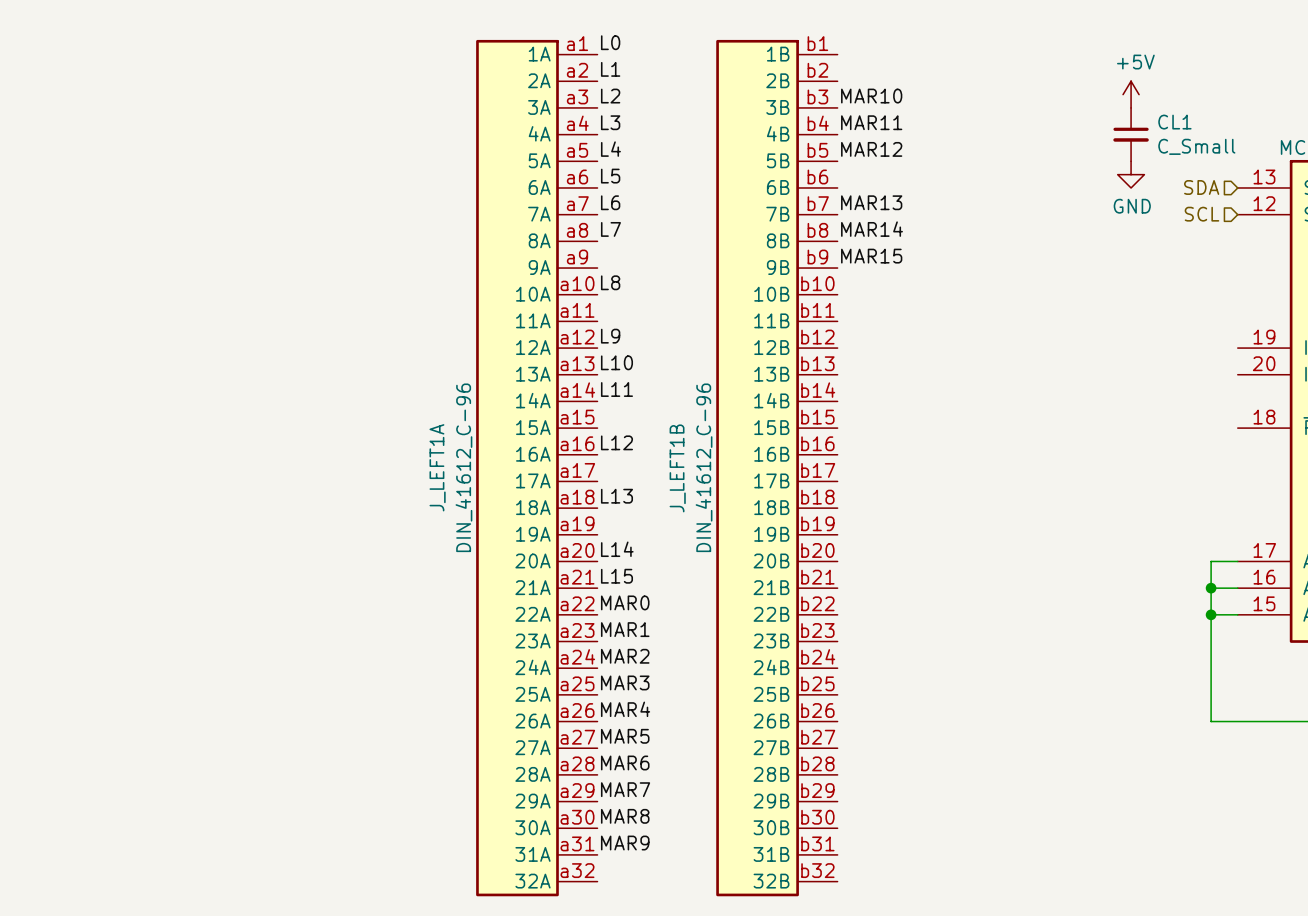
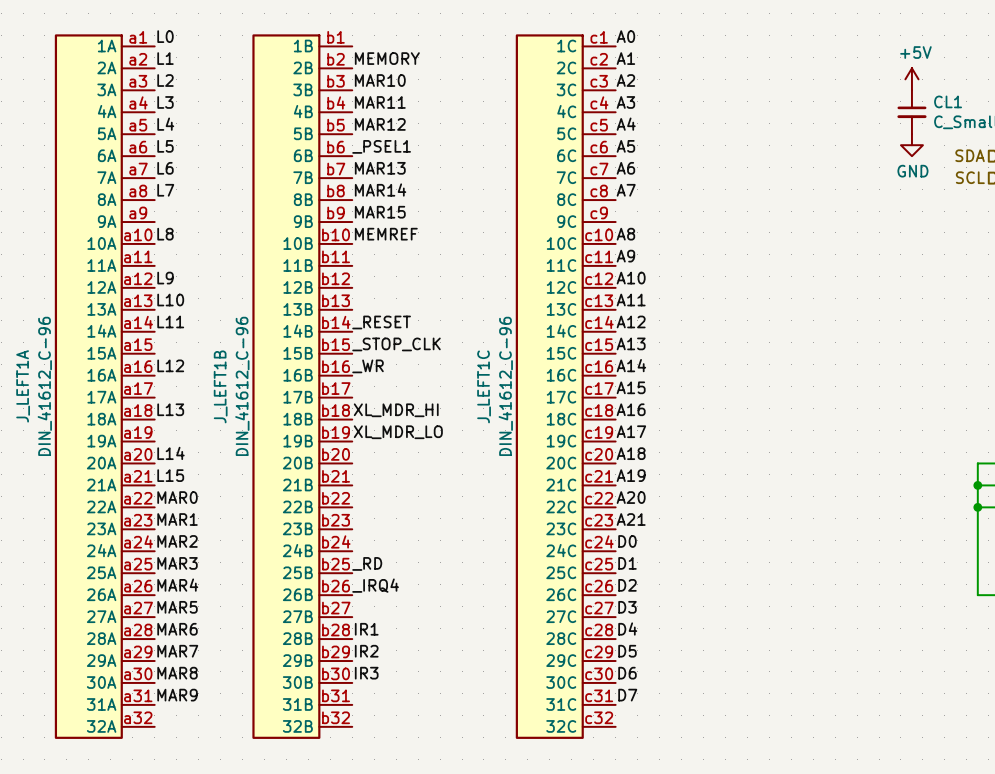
label: none -> L0 (165, 36)
label: L0 (610, 42) -> none
label: none -> A0 (625, 36)
label: none -> L1 (165, 58)
label: none -> MEMORY (387, 58)
label: L1 (610, 69) -> none
label: none -> A1 (625, 58)
label: none -> L2 (165, 80)
label: none -> MAR10 (380, 80)
label: L2 (610, 96) -> none
label: none -> A2 (625, 80)
label: MAR10 (871, 96) -> none
label: none -> L3 (165, 102)
label: none -> MAR11 (380, 102)
label: L3 (610, 122) -> none
label: none -> A3 (625, 102)
label: MAR11 (871, 122) -> none
label: none -> L4 (165, 124)
label: none -> MAR12 (380, 124)
label: L4 (610, 149) -> none
label: none -> A4 (626, 124)
label: MAR12 (871, 149) -> none
label: none -> L5 (165, 146)
label: none -> _PSEL1 (381, 146)
label: L5 (610, 176) -> none
label: none -> A5 (625, 146)
label: none -> L6 (165, 168)
label: none -> MAR13 (380, 168)
label: L6 (610, 202) -> none
label: none -> A6 (625, 168)
label: MAR13 (871, 202) -> none
label: none -> L7 (165, 190)
label: none -> MAR14 (380, 190)
label: L7 (610, 229) -> none
label: none -> A7 (626, 190)
label: MAR14 (872, 229) -> none
label: none -> MAR15 (380, 212)
label: MAR15 (871, 256) -> none
label: none -> L8 (165, 234)
label: none -> MEMREF (386, 234)
label: L8 (610, 282) -> none
label: none -> A8 (625, 234)
label: none -> A9 (625, 256)
label: none -> L9 (165, 278)
label: L9 (610, 336) -> none
label: none -> A10 (631, 278)
label: none -> L10 (170, 300)
label: L10 (616, 362) -> none
label: none -> A11 (631, 300)
label: none -> L11 (170, 321)
label: L11 (616, 389) -> none
label: none -> A12 (631, 321)
label: none -> _RESET (381, 322)
label: none -> _STOP_CLK (396, 344)
label: none -> A13 (631, 343)
label: none -> L12 (170, 365)
label: L12 (616, 442) -> none
label: none -> A14 (631, 365)
label: none -> _WR (368, 366)
J_LEFT1A position: (536, 468) -> (104, 386)
J_LEFT1C: none -> DIN_41612_C-96 (565, 386)
J_LEFT1B position: (776, 468) -> (302, 386)
label: none -> A15 (631, 387)
label: none -> L13 (170, 409)
label: none -> XL_MDR_HI (396, 410)
label: L13 (616, 496) -> none
label: none -> A16 (631, 409)
label: none -> A17 (631, 431)
label: none -> XL_MDR_LO (398, 432)
label: none -> L14 (170, 453)
label: L14 (617, 549) -> none
label: none -> A18 (631, 453)
label: none -> L15 (170, 475)
label: L15 (616, 576) -> none
label: none -> A19 (631, 475)
label: none -> MAR0 (177, 497)
label: MAR0 (625, 602) -> none
label: none -> A20 (631, 497)
label: none -> MAR1 (177, 519)
label: MAR1 (625, 629) -> none
label: none -> A21 (631, 519)
label: none -> MAR2 (177, 541)
label: MAR2 (625, 656) -> none
label: none -> D0 (627, 541)
label: none -> MAR3 (177, 563)
label: MAR3 (625, 682) -> none
label: none -> D1 (627, 563)
label: none -> _RD (367, 563)
label: none -> MAR4 (177, 585)
label: none -> _IRQ4 (375, 585)
label: MAR4 (625, 709) -> none
label: none -> D2 (627, 585)
label: none -> MAR5 (177, 607)
label: MAR5 (625, 736) -> none
label: none -> D3 (627, 607)
label: none -> MAR6 (177, 629)
label: none -> IR1 (366, 629)
label: MAR6 (625, 762) -> none
label: none -> D4 (627, 629)
label: none -> MAR7 (177, 651)
label: none -> IR2 (366, 651)
label: MAR7 (625, 789) -> none
label: none -> D5 (627, 651)
label: none -> MAR8 (177, 673)
label: none -> IR3 (366, 673)
label: MAR8 (625, 816) -> none
label: none -> D6 (627, 673)
label: none -> MAR9 (177, 695)
label: MAR9 (625, 843) -> none
label: none -> D7 (627, 695)

